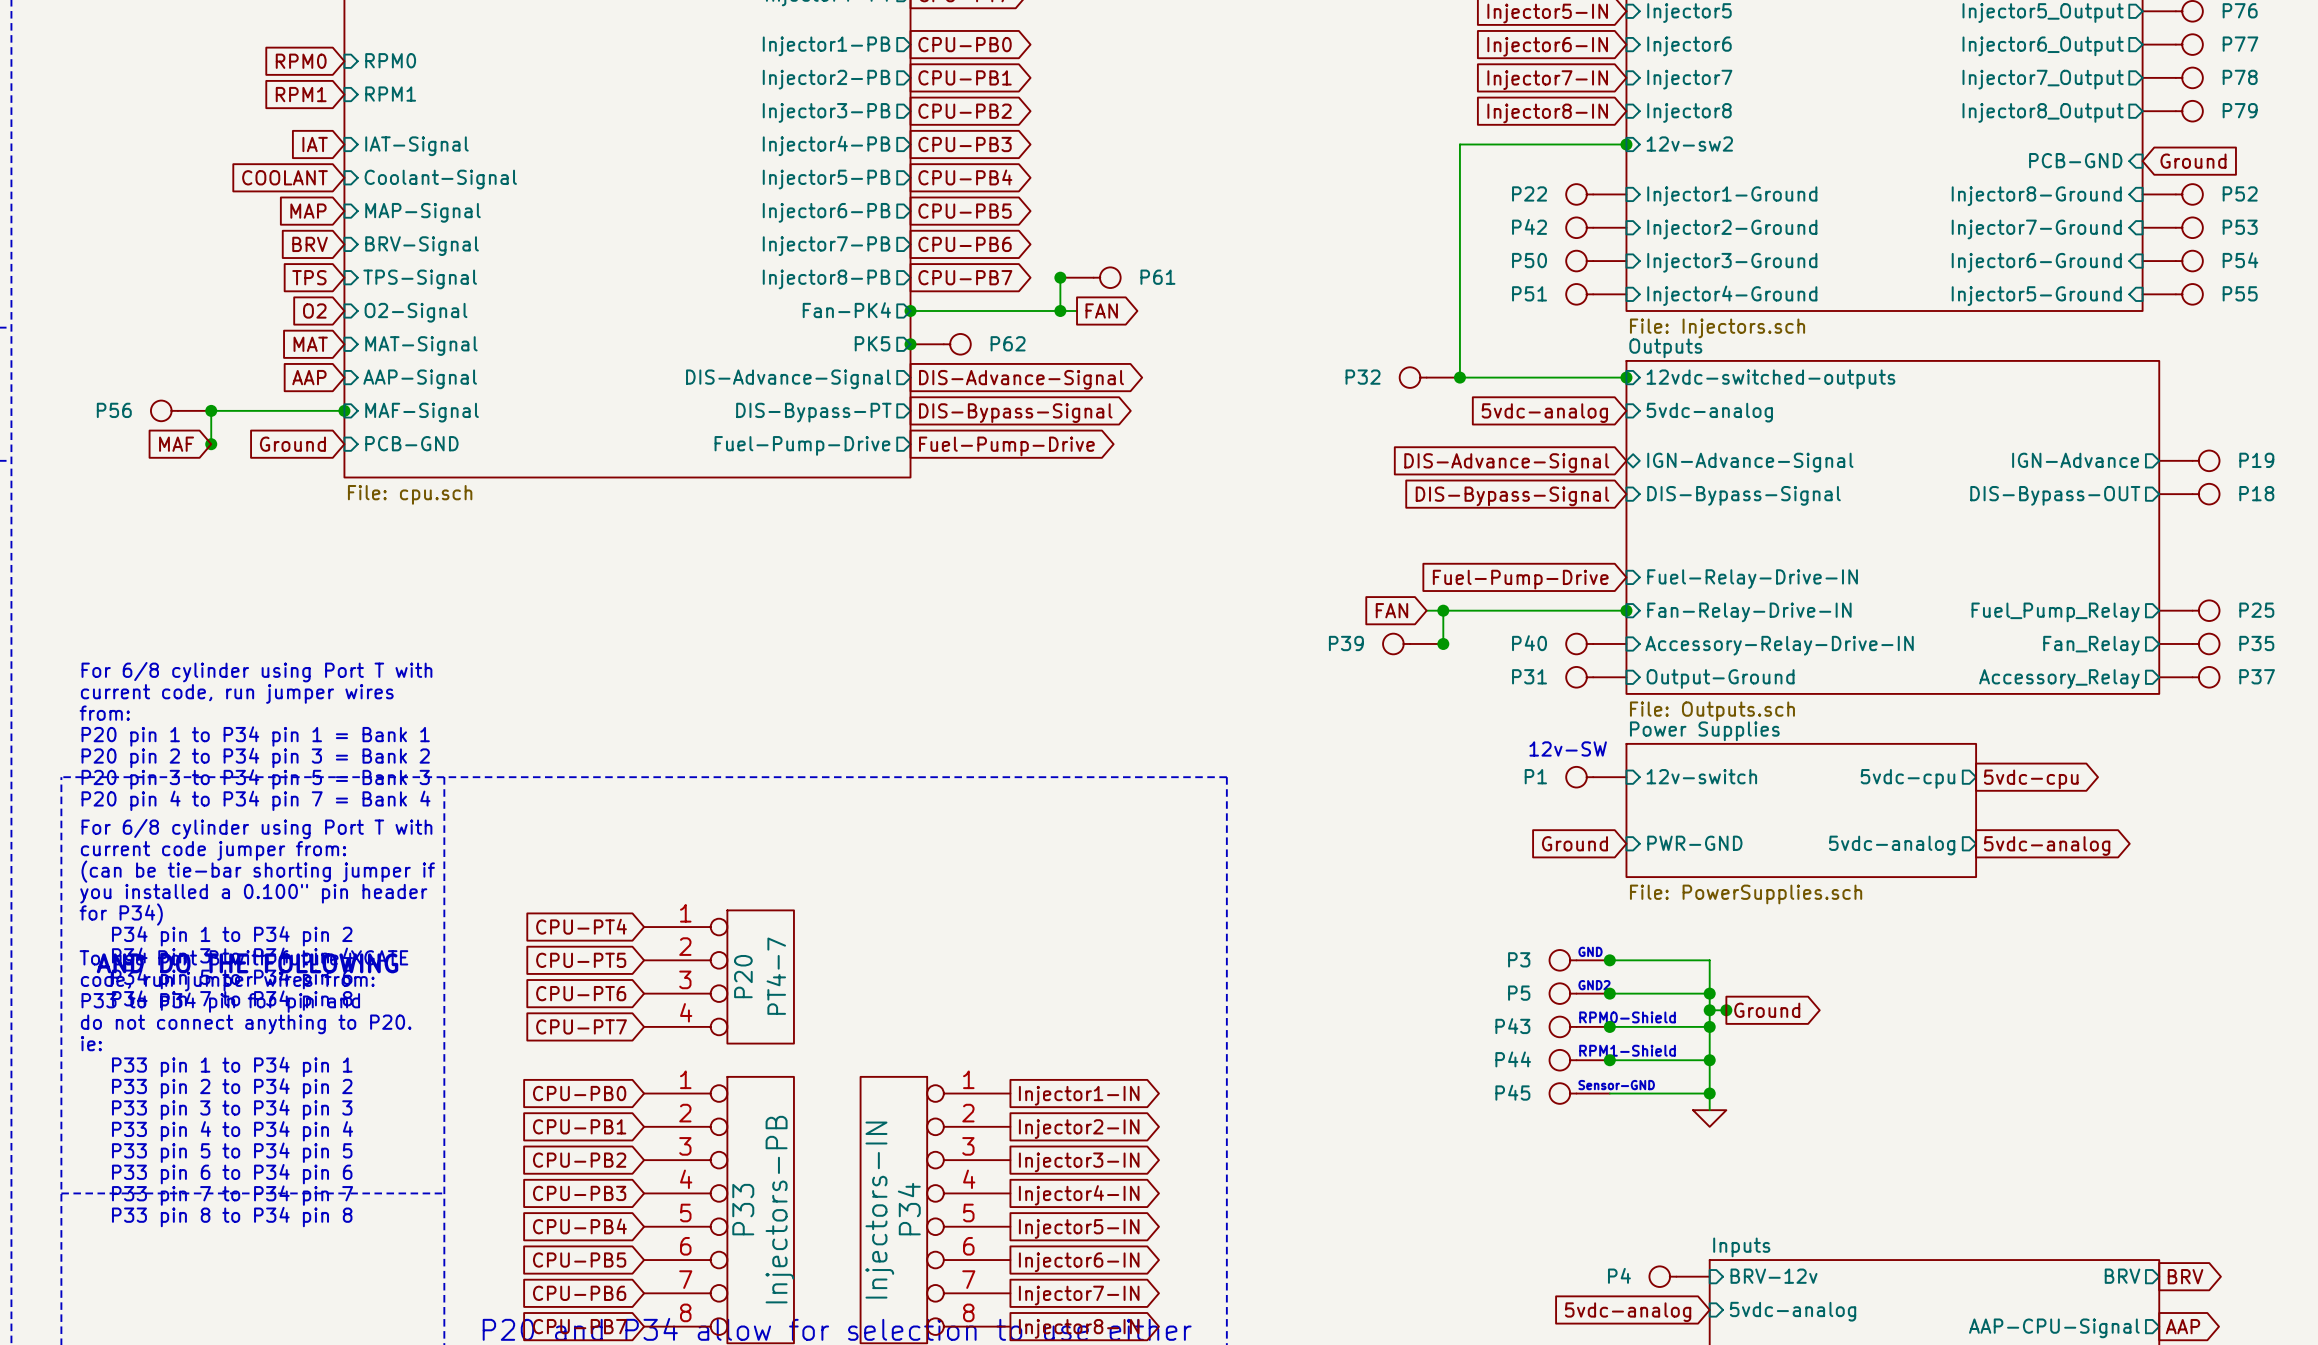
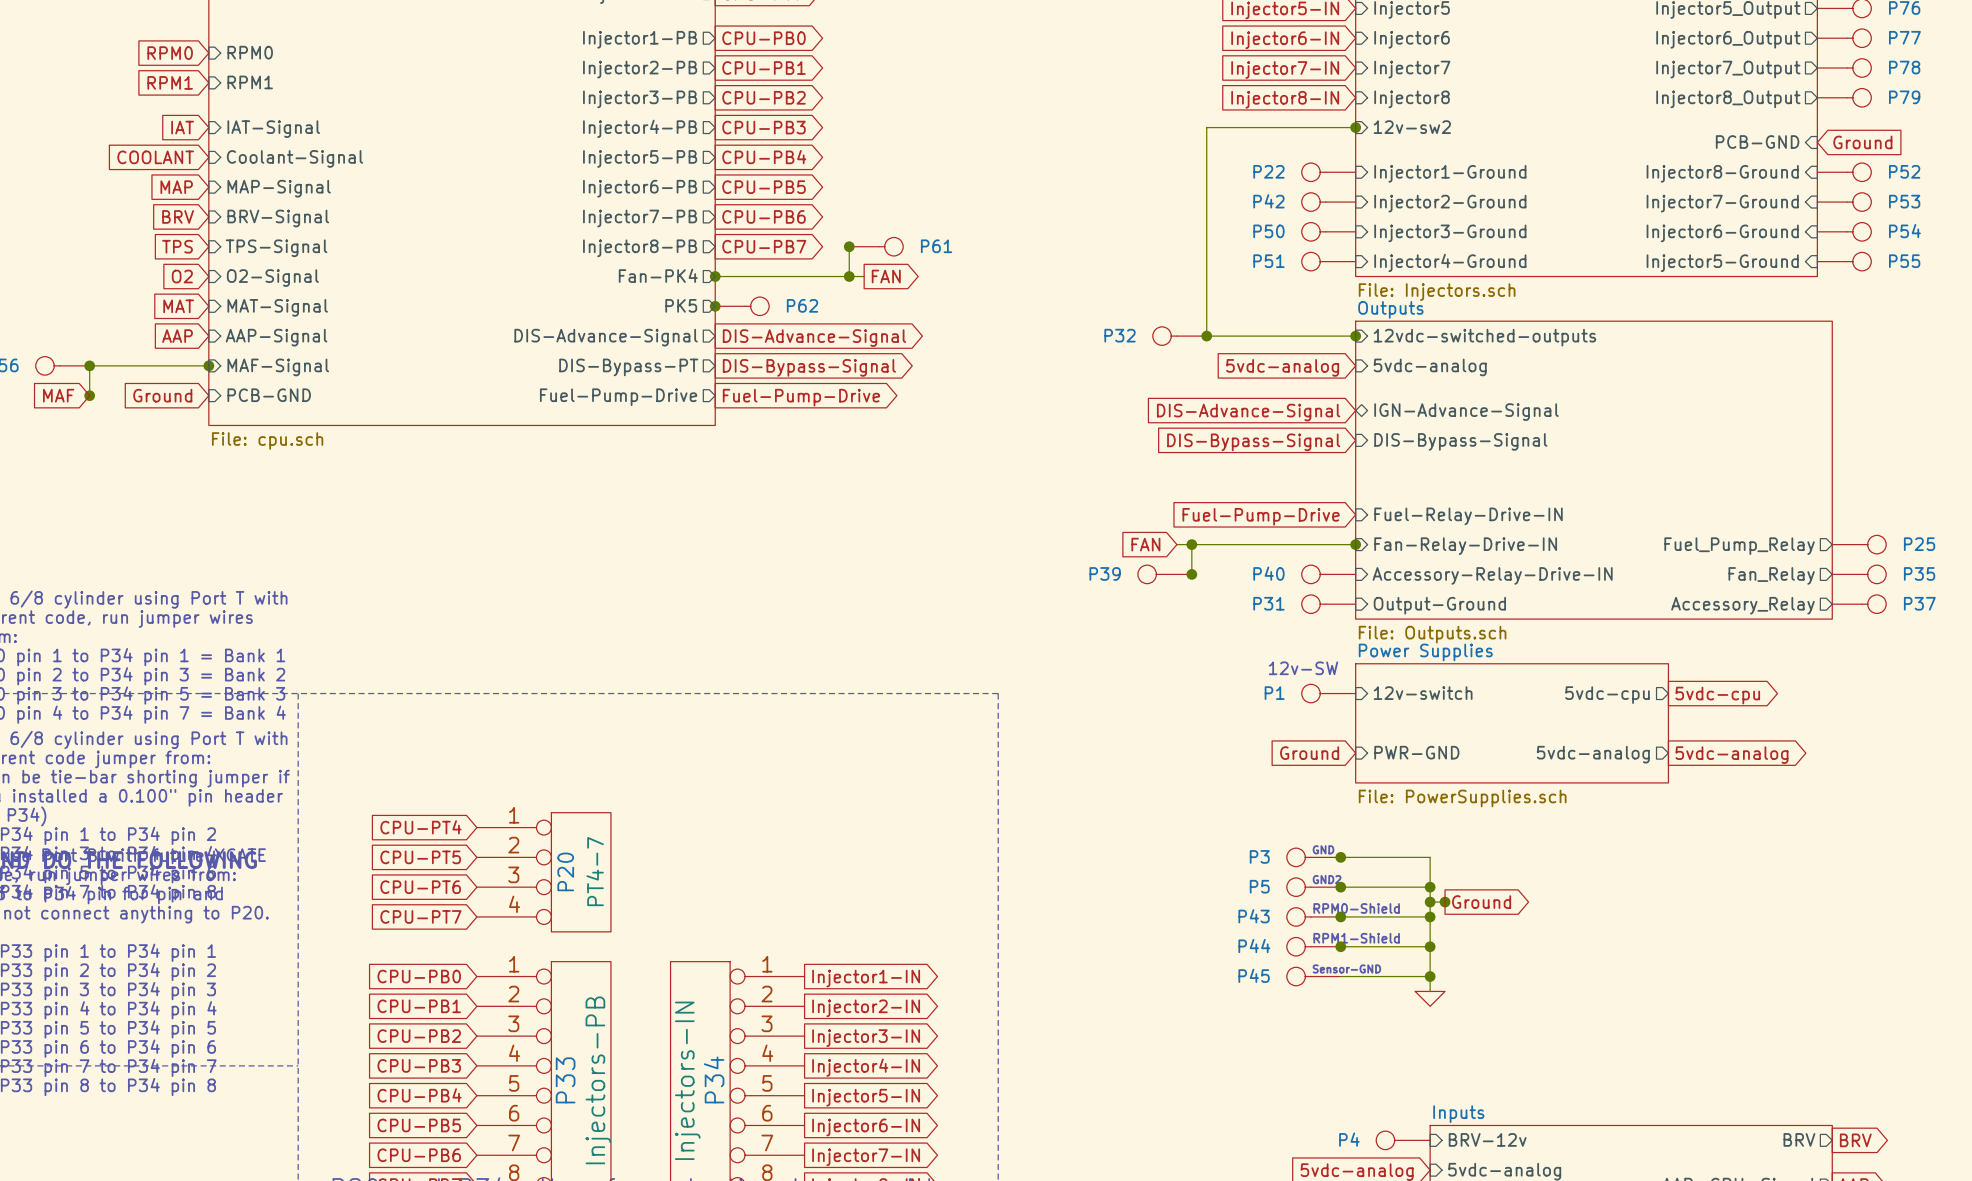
sheet pin: IGN-Advance (2075, 460) -> none
P19: (2189, 460) -> none
P18: (2189, 494) -> none
sheet pin: DIS-Bypass-OUT (2055, 495) -> none

